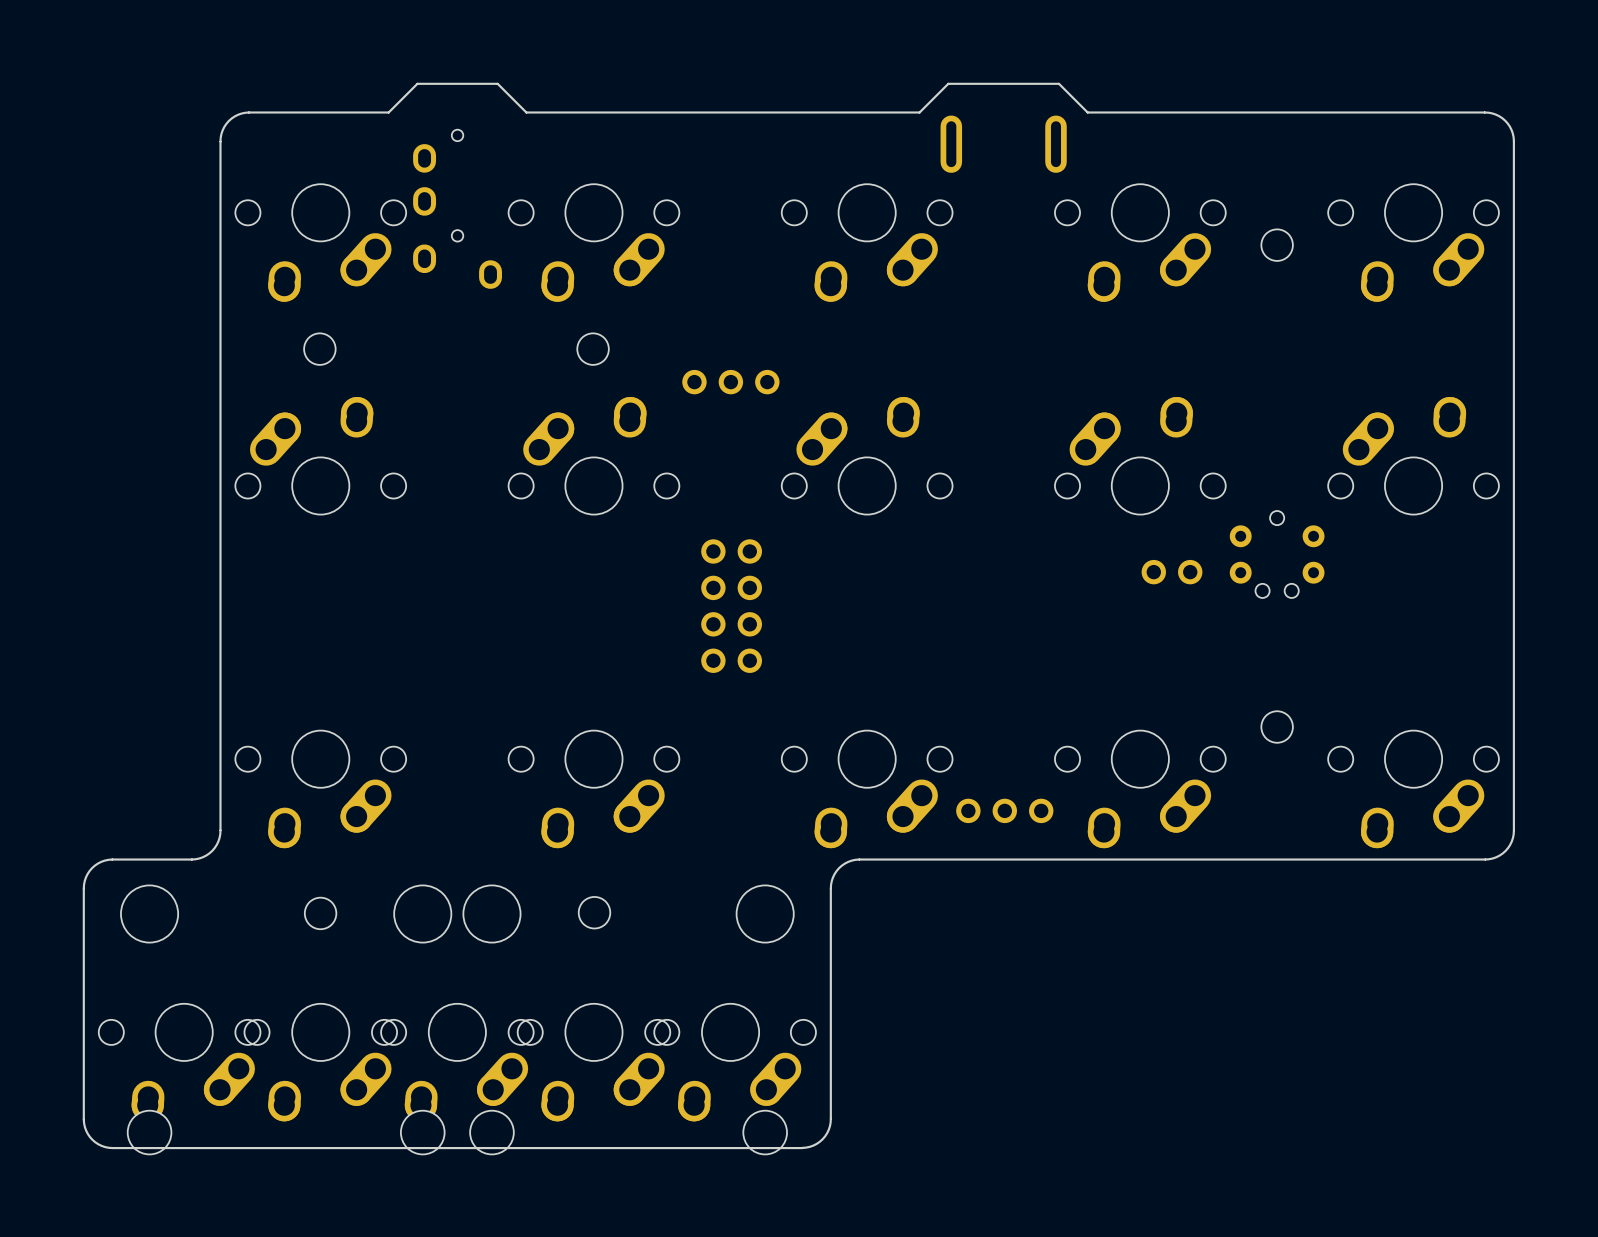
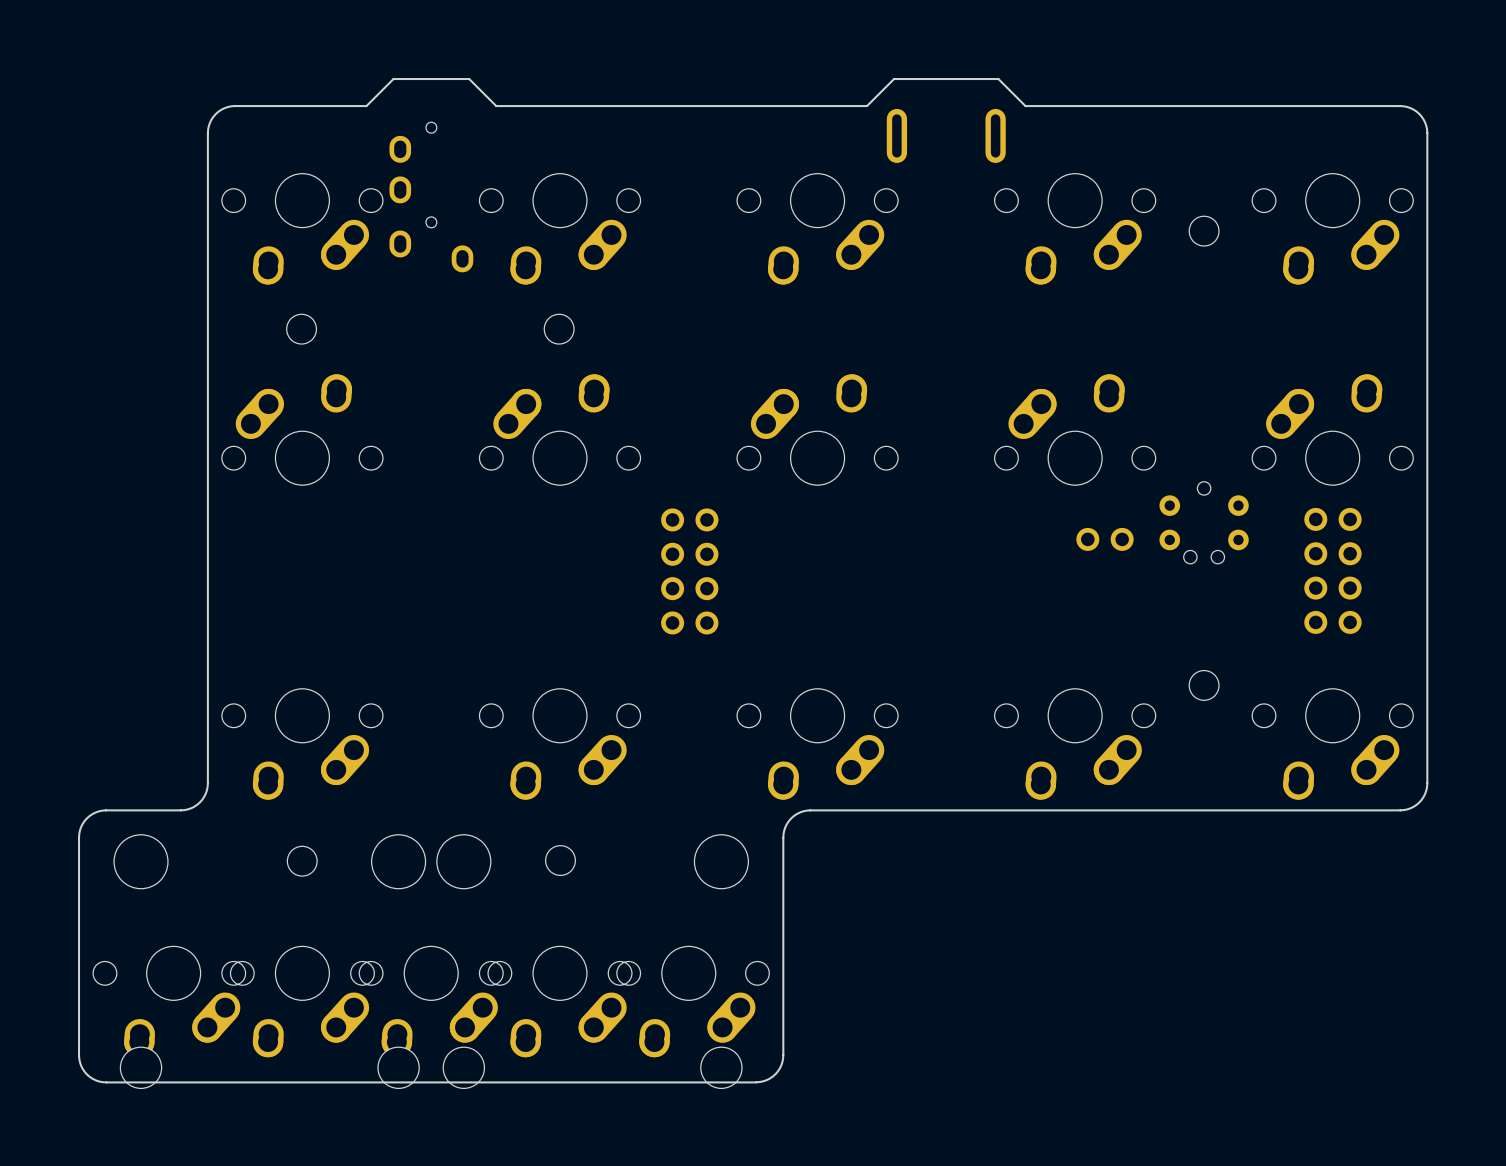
part: (730, 382) -> none
part: none -> (1332, 570)
part: (1004, 810) -> none

